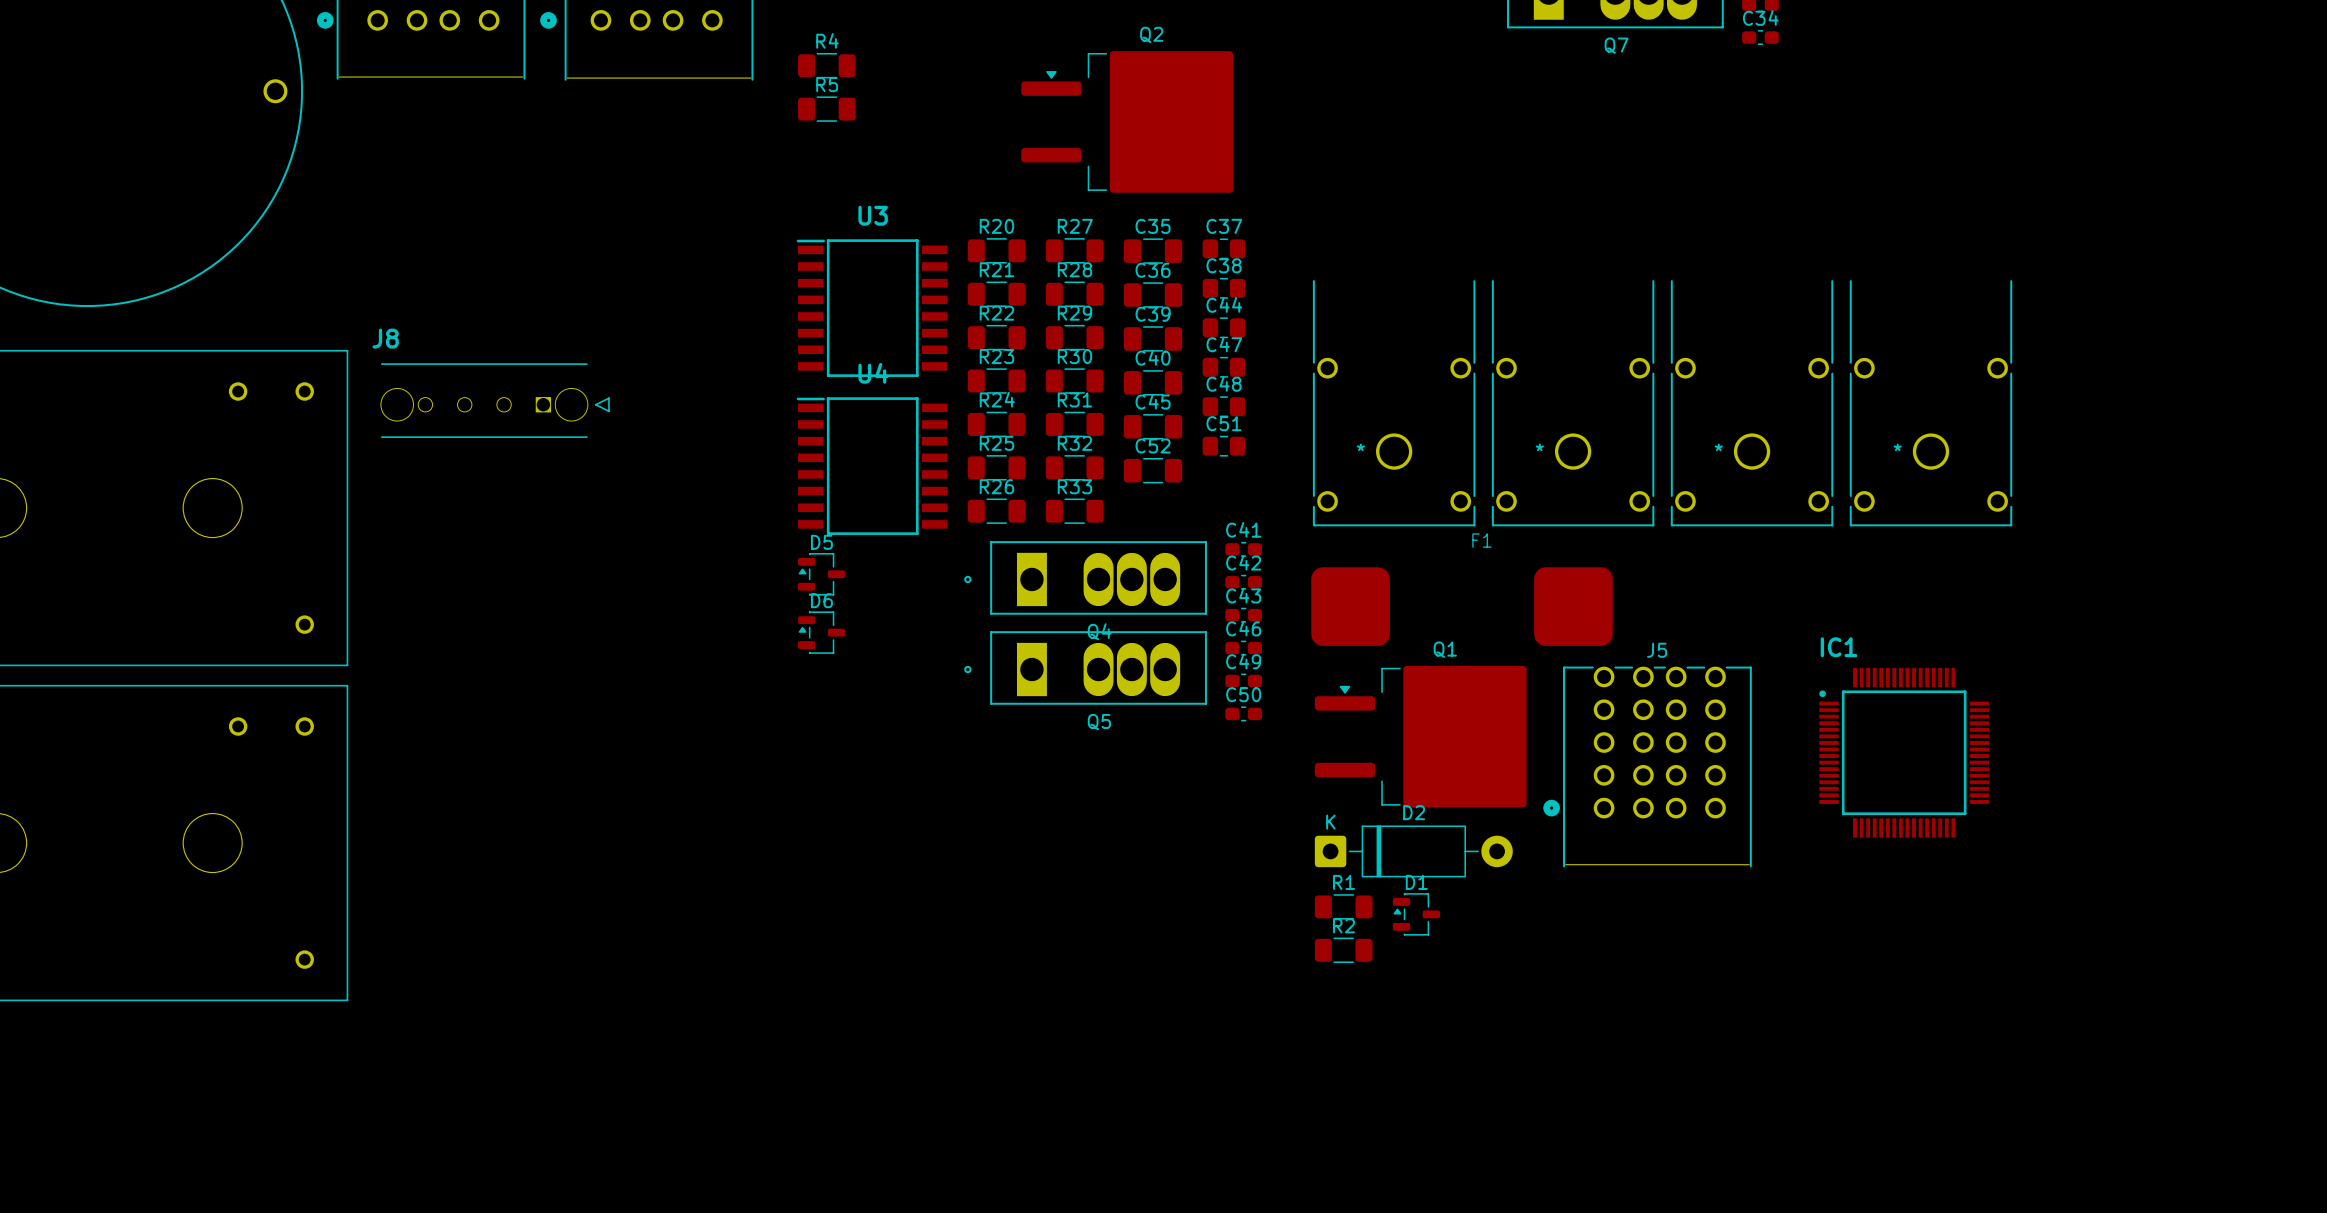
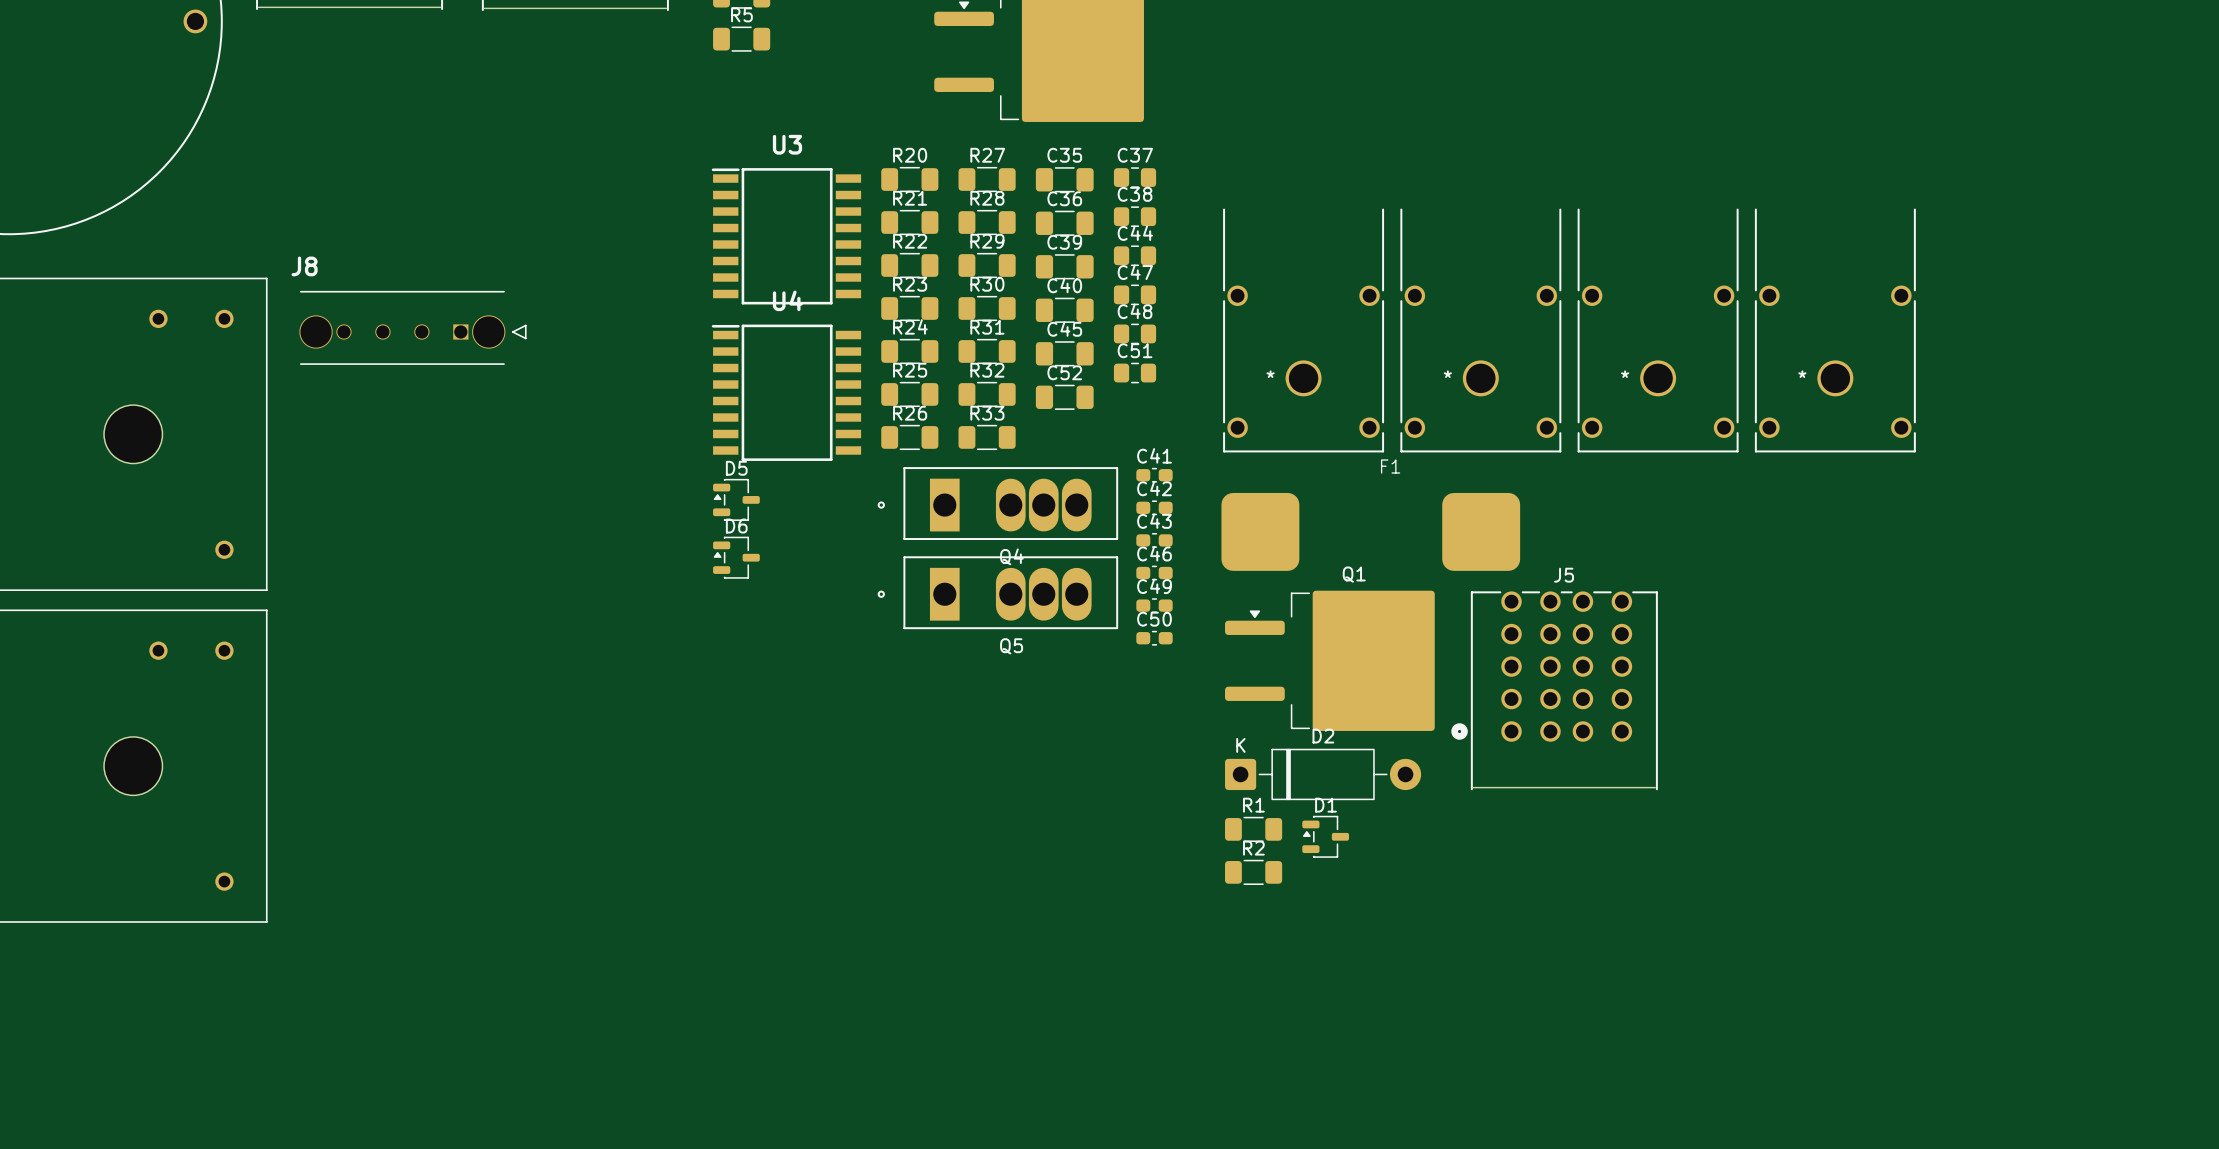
IC1: (1904, 752) -> none

